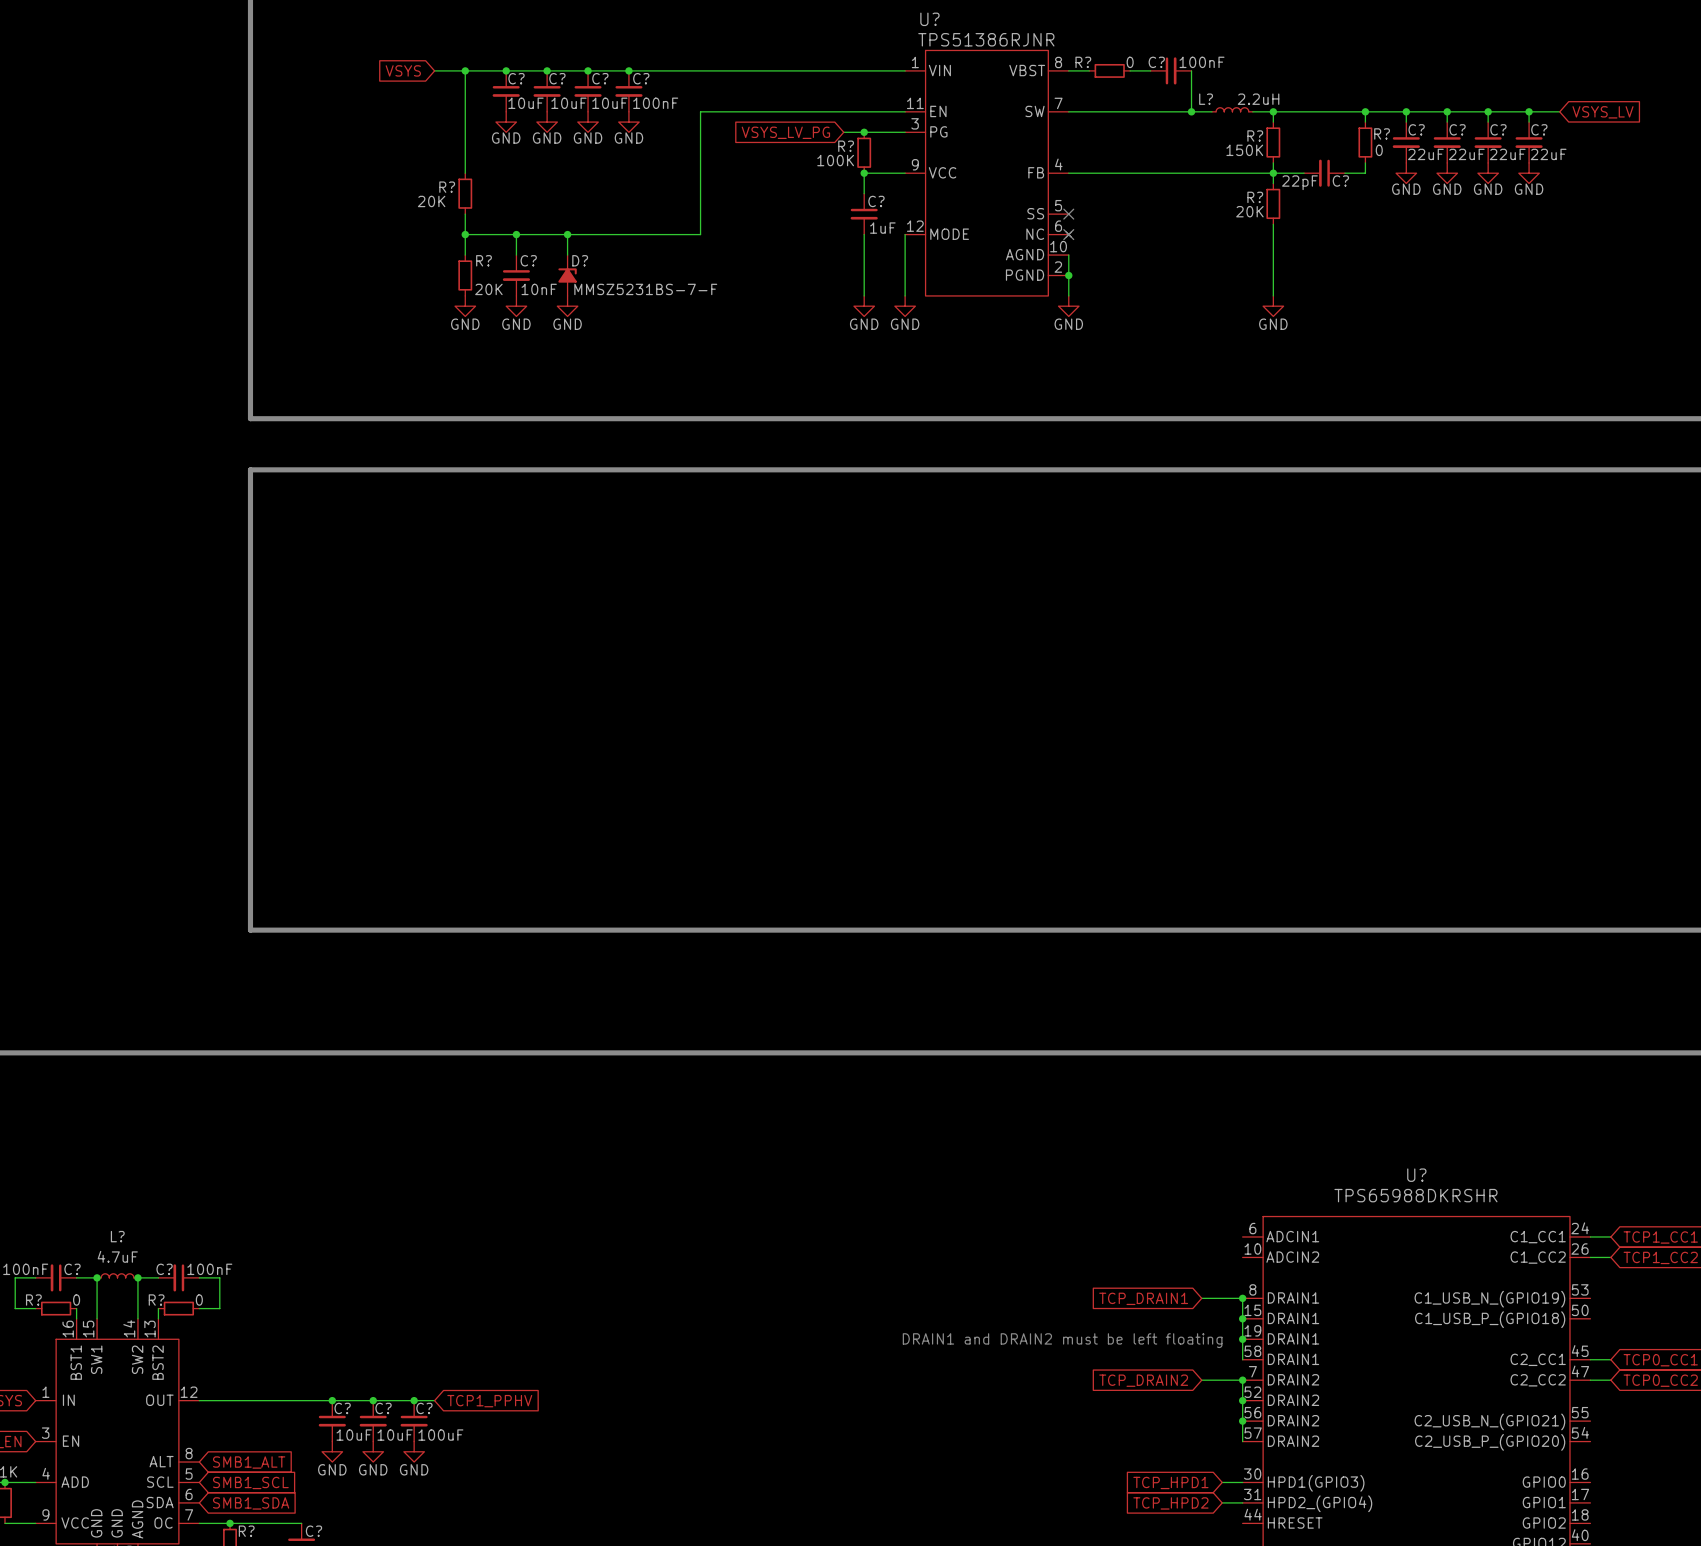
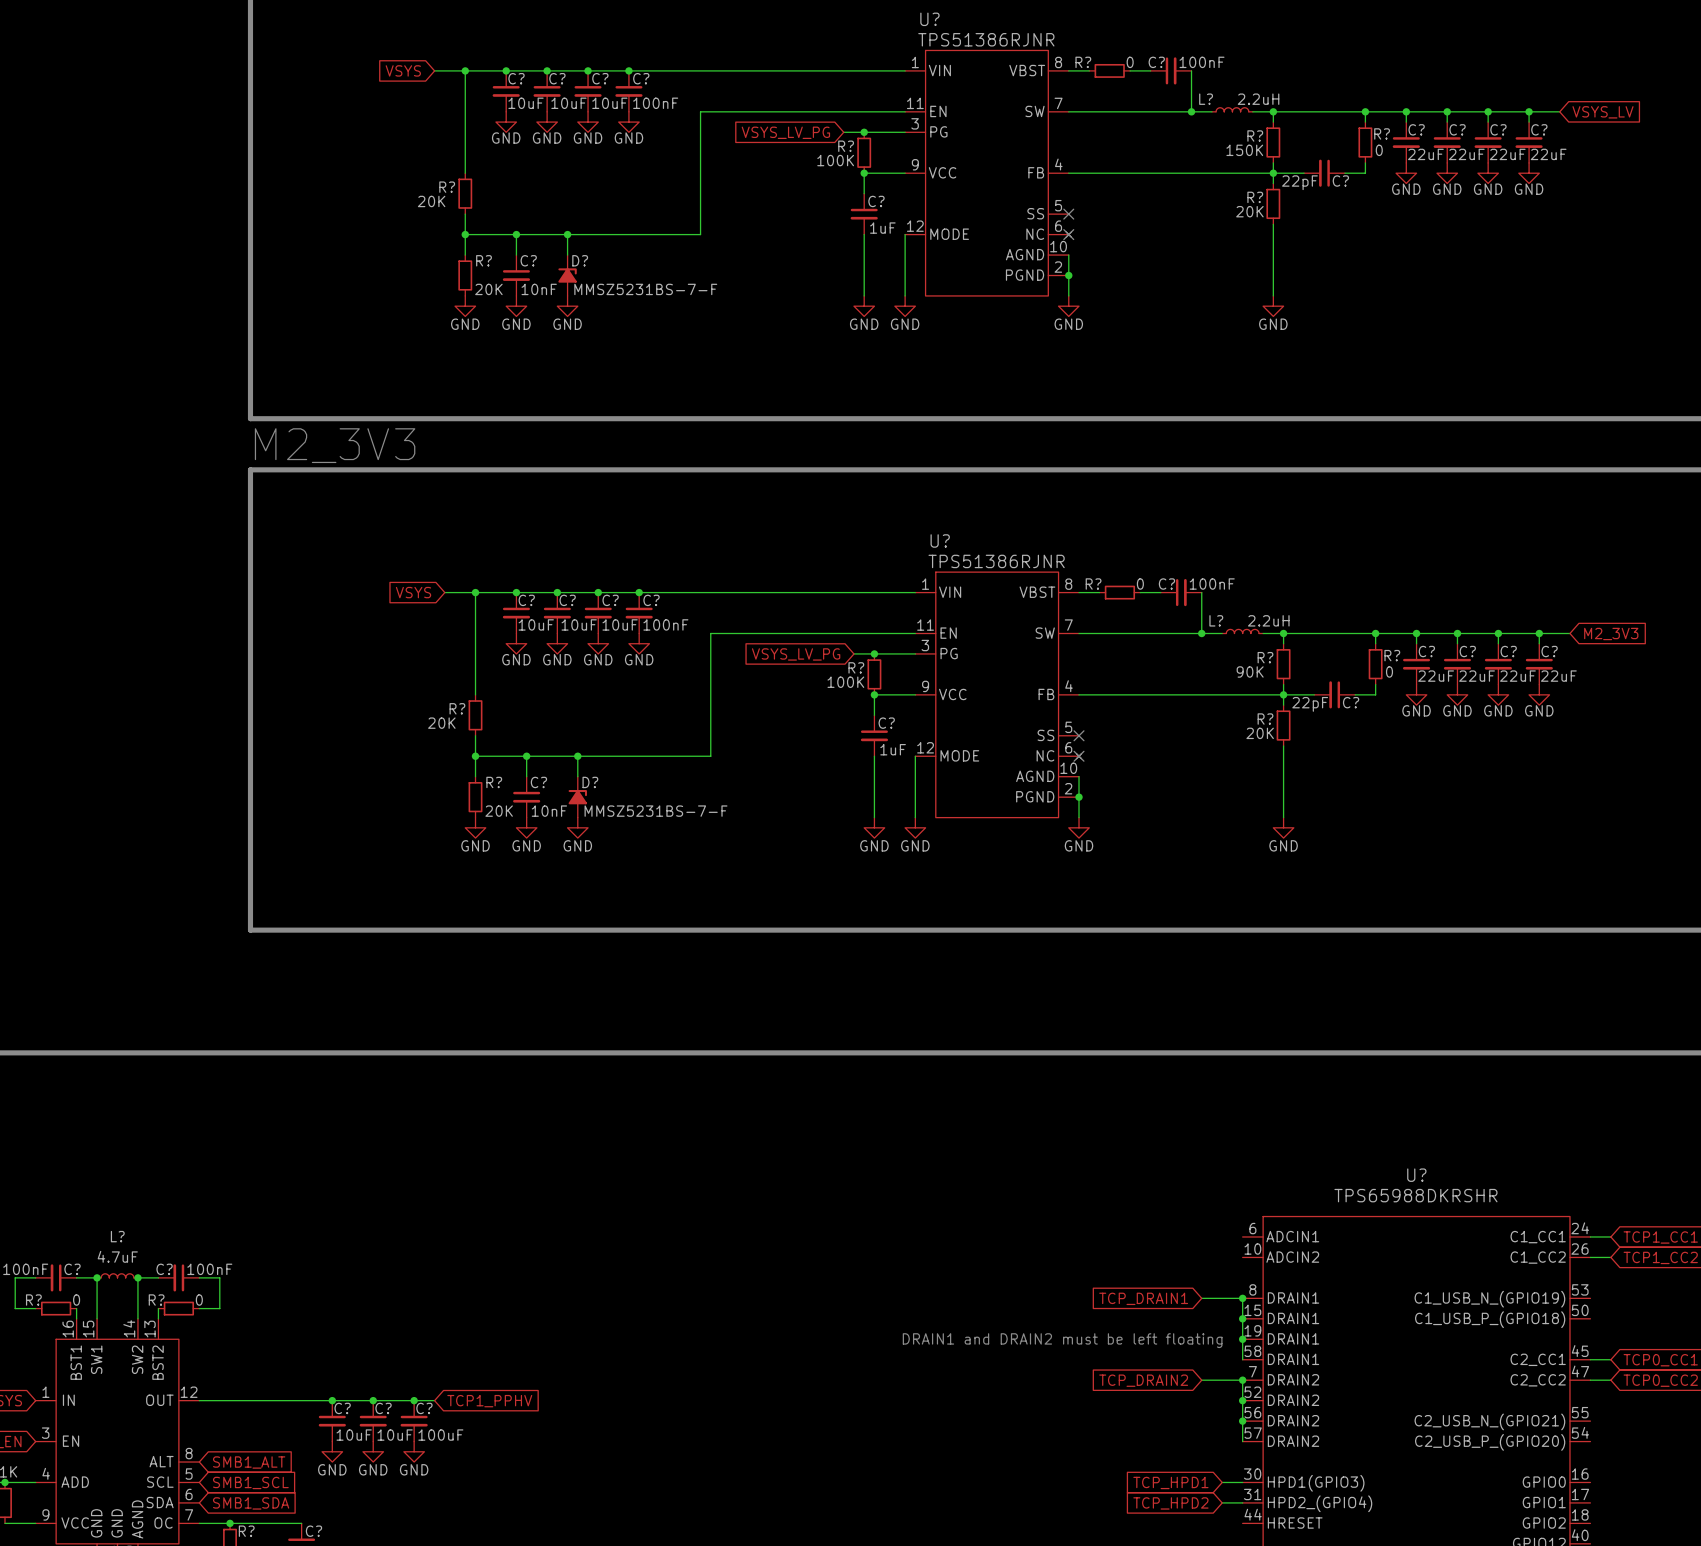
text: none -> M2_3V3 (335, 445)
global label: none -> VSYS (413, 592)
wire: none -> (444, 592) (915, 592)
wire: none -> (475, 592) (475, 694)
junction: none -> (475, 592)
junction: none -> (516, 592)
junction: none -> (557, 592)
junction: none -> (598, 592)
junction: none -> (639, 592)
wire: none -> (1079, 592) (1099, 592)
R?: none -> 0 (1119, 592)
wire: none -> (1140, 592) (1160, 592)
C?: none -> 100nF (1181, 592)
wire: none -> (1201, 592) (1201, 633)
C?: none -> 10uF (516, 613)
C?: none -> 10uF (557, 613)
C?: none -> 10uF (598, 613)
C?: none -> 100nF (639, 613)
L?: none -> 2.2uH (1242, 631)
wire: none -> (915, 633) (710, 633) (710, 756) (475, 756)
wire: none -> (1079, 633) (1222, 633)
junction: none -> (1201, 633)
wire: none -> (1263, 633) (1569, 633)
wire: none -> (1283, 633) (1283, 643)
junction: none -> (1283, 633)
wire: none -> (1375, 633) (1375, 643)
junction: none -> (1375, 633)
wire: none -> (1416, 633) (1416, 643)
junction: none -> (1416, 633)
wire: none -> (1457, 633) (1457, 643)
junction: none -> (1457, 633)
wire: none -> (1498, 633) (1498, 643)
junction: none -> (1498, 633)
wire: none -> (1539, 633) (1539, 643)
junction: none -> (1539, 633)
global label: none -> M2_3V3 (1611, 633)
power symbol: none -> GND (516, 643)
power symbol: none -> GND (557, 643)
power symbol: none -> GND (598, 643)
power symbol: none -> GND (639, 643)
wire: none -> (853, 653) (915, 653)
junction: none -> (874, 653)
global label: none -> VSYS_LV_PG (796, 654)
R?: none -> 90K (1283, 664)
R?: none -> 0 (1375, 664)
C?: none -> 22uF (1416, 664)
C?: none -> 22uF (1457, 664)
C?: none -> 22uF (1498, 664)
C?: none -> 22uF (1539, 664)
R?: none -> 100K (874, 674)
wire: none -> (1283, 684) (1283, 705)
wire: none -> (1375, 684) (1375, 694) (1355, 694)
junction: none -> (874, 694)
wire: none -> (915, 694) (874, 694) (874, 715)
U?: none -> TPS51386RJNR (998, 694)
wire: none -> (1079, 694) (1314, 694)
junction: none -> (1283, 694)
C?: none -> 22pF (1334, 694)
power symbol: none -> GND (1416, 694)
power symbol: none -> GND (1457, 694)
power symbol: none -> GND (1498, 694)
power symbol: none -> GND (1539, 694)
R?: none -> 20K (475, 715)
R?: none -> 20K (1283, 725)
wire: none -> (475, 735) (475, 776)
C?: none -> 1uF (874, 735)
no-connect mark: none -> (1079, 735)
wire: none -> (1283, 746) (1283, 817)
junction: none -> (475, 756)
wire: none -> (526, 756) (526, 776)
junction: none -> (526, 756)
wire: none -> (577, 756) (577, 776)
junction: none -> (577, 756)
wire: none -> (874, 756) (874, 817)
wire: none -> (915, 756) (915, 817)
no-connect mark: none -> (1079, 756)
wire: none -> (1079, 776) (1079, 817)
R?: none -> 20K (475, 797)
C?: none -> 10nF (526, 797)
D?: none -> MMSZ5231BS-7-F (577, 797)
junction: none -> (1079, 797)
power symbol: none -> GND (475, 827)
power symbol: none -> GND (526, 827)
power symbol: none -> GND (577, 827)
power symbol: none -> GND (874, 827)
power symbol: none -> GND (915, 827)
power symbol: none -> GND (1079, 827)
power symbol: none -> GND (1283, 827)

